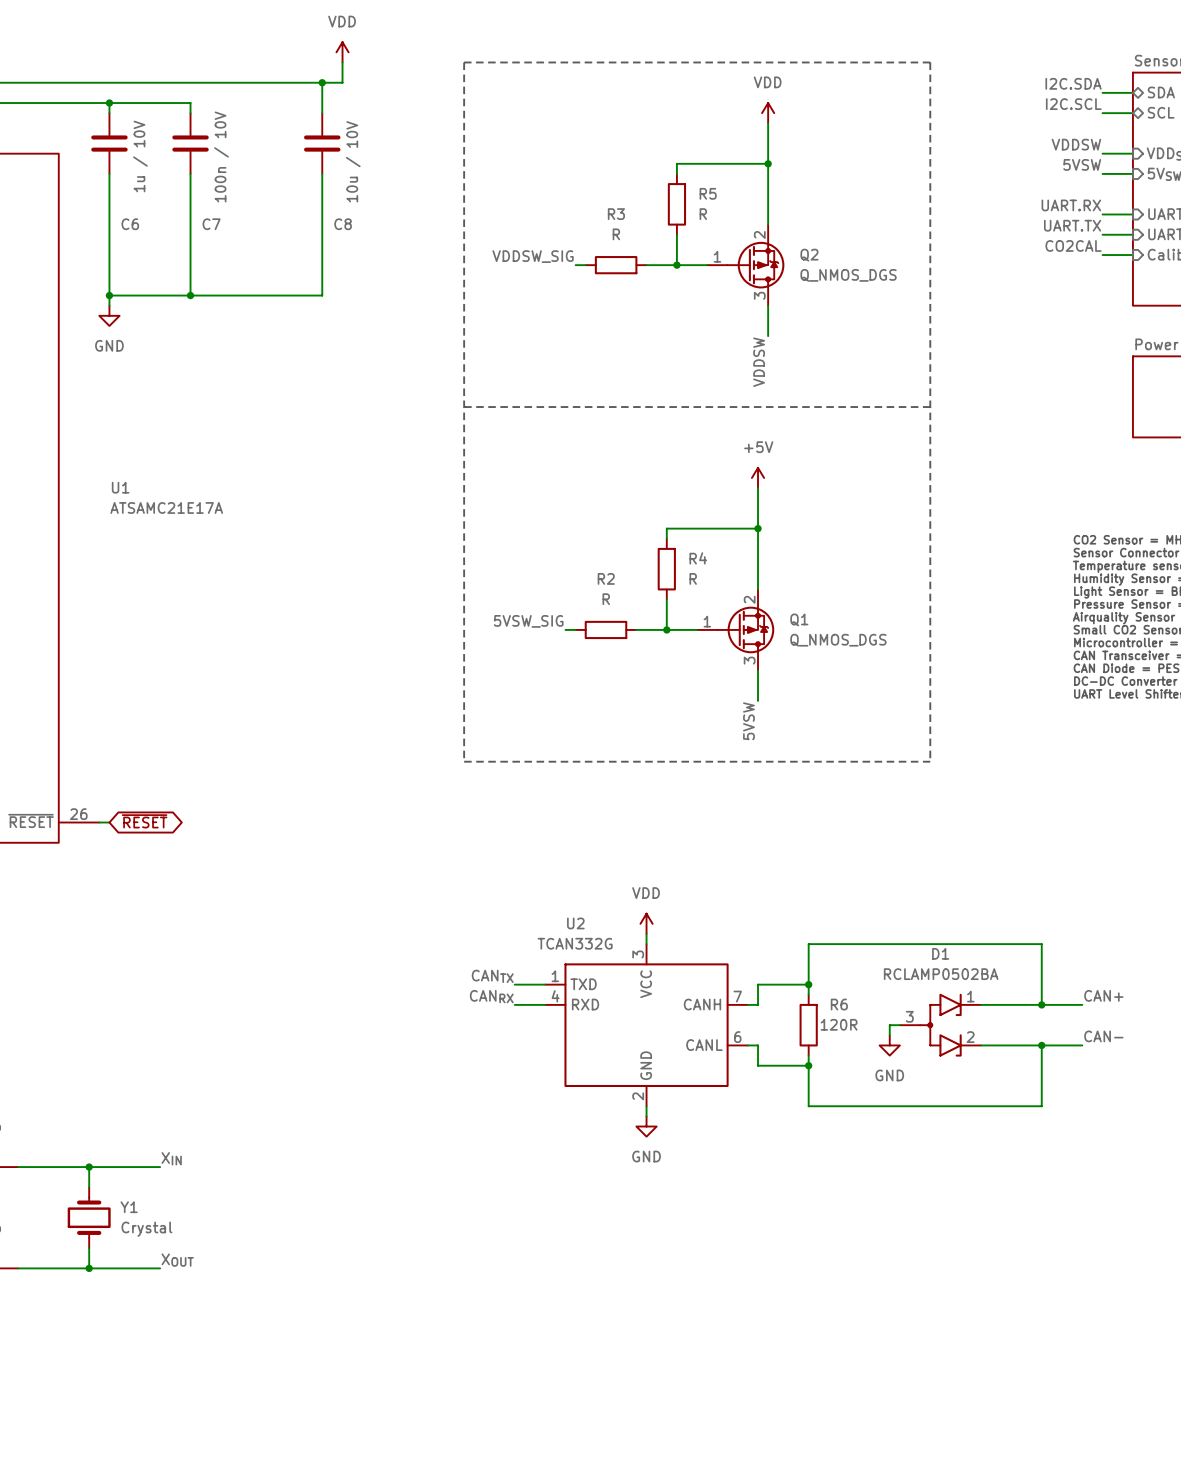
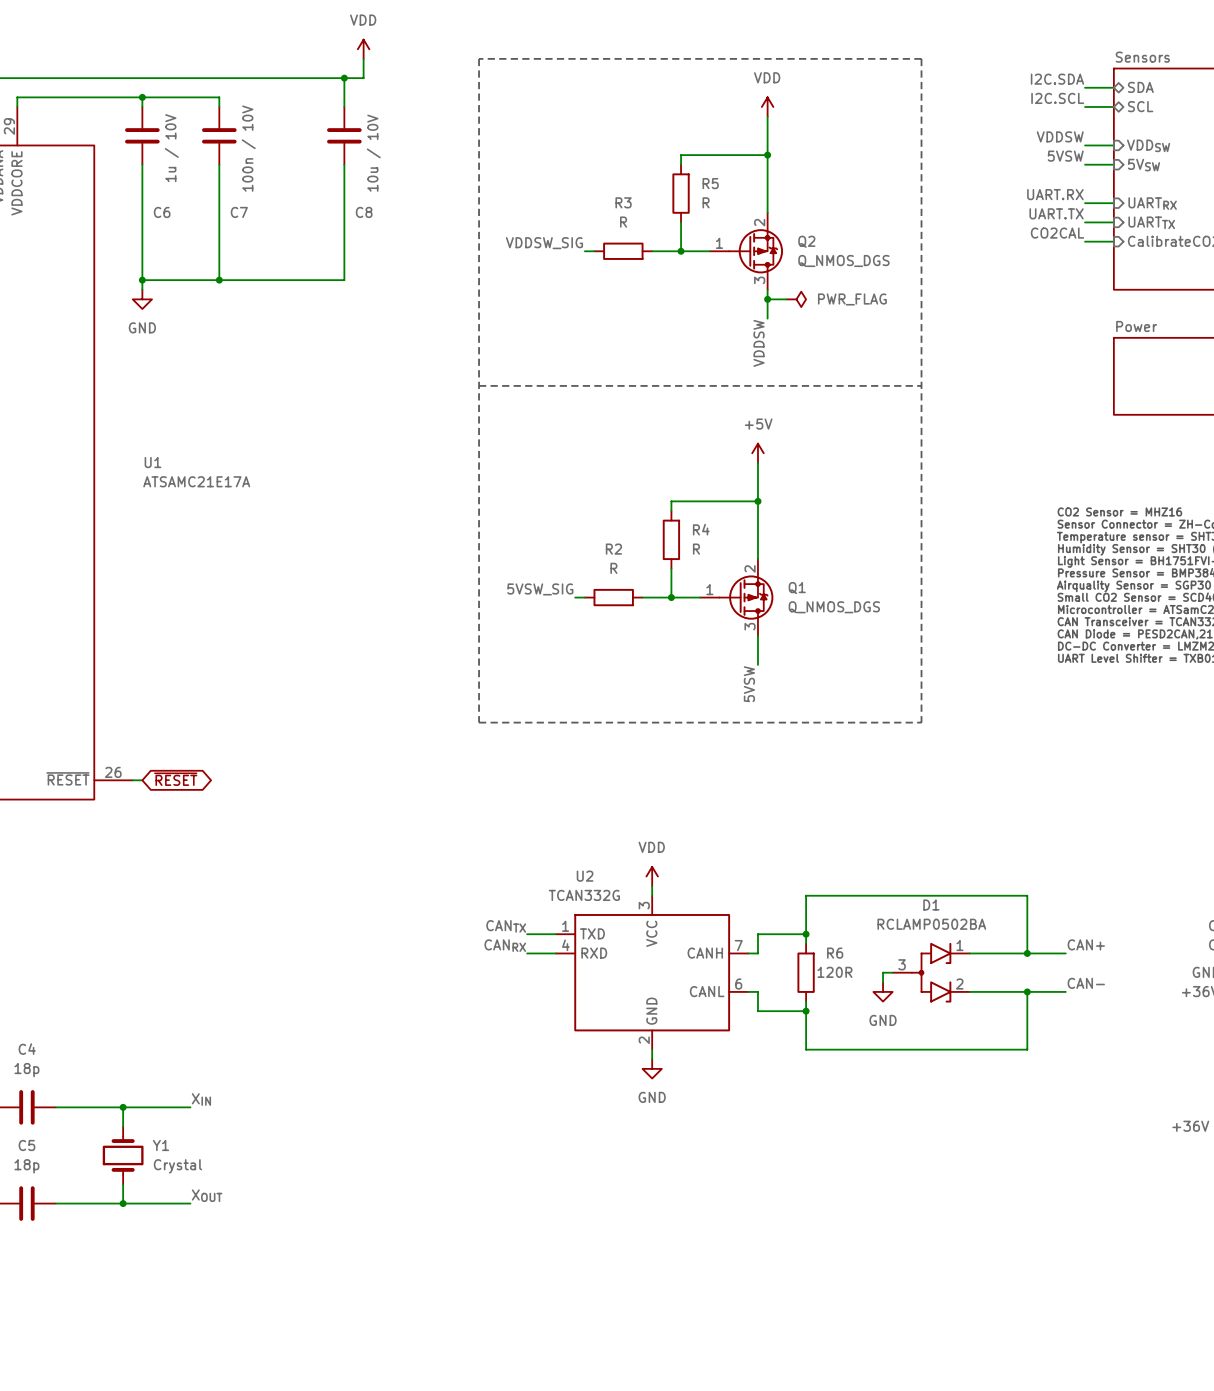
wire: none -> (767, 299) (786, 299)
junction: none -> (767, 299)
power symbol: none -> PWR_FLAG (796, 299)

